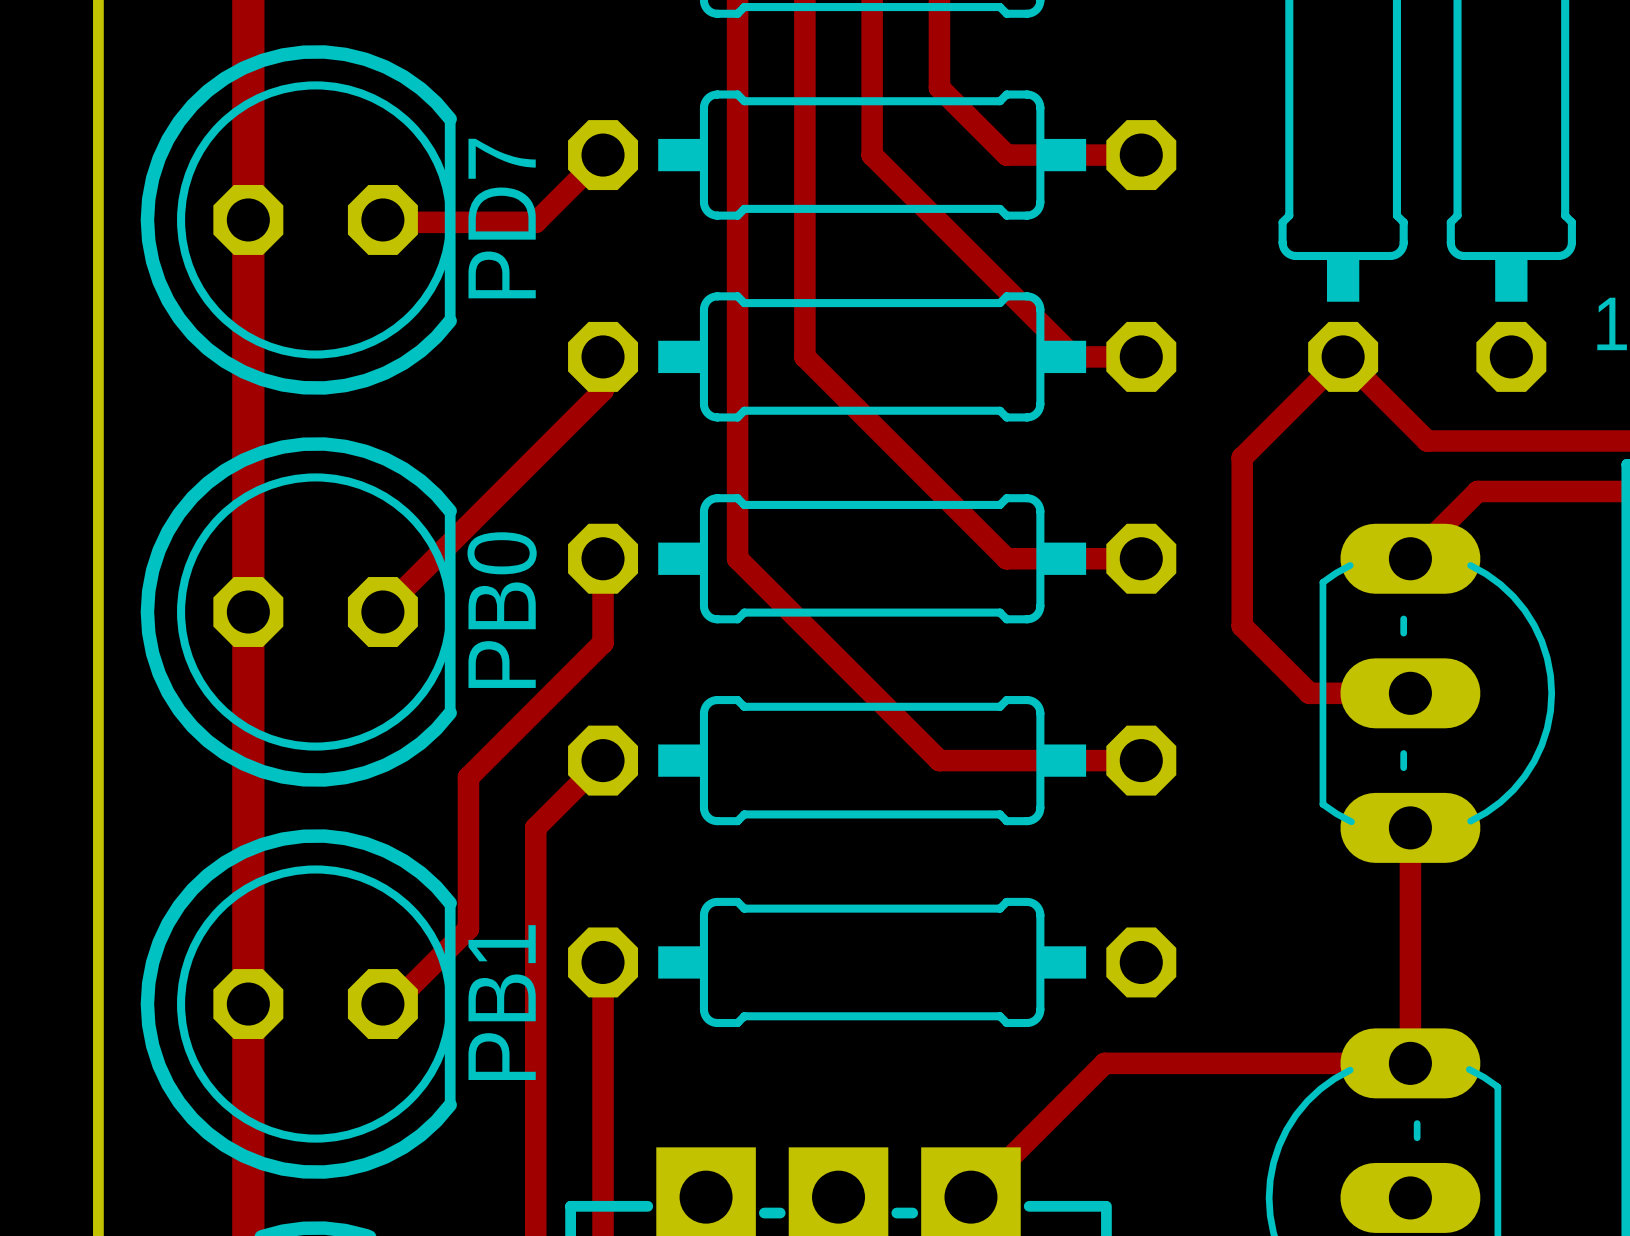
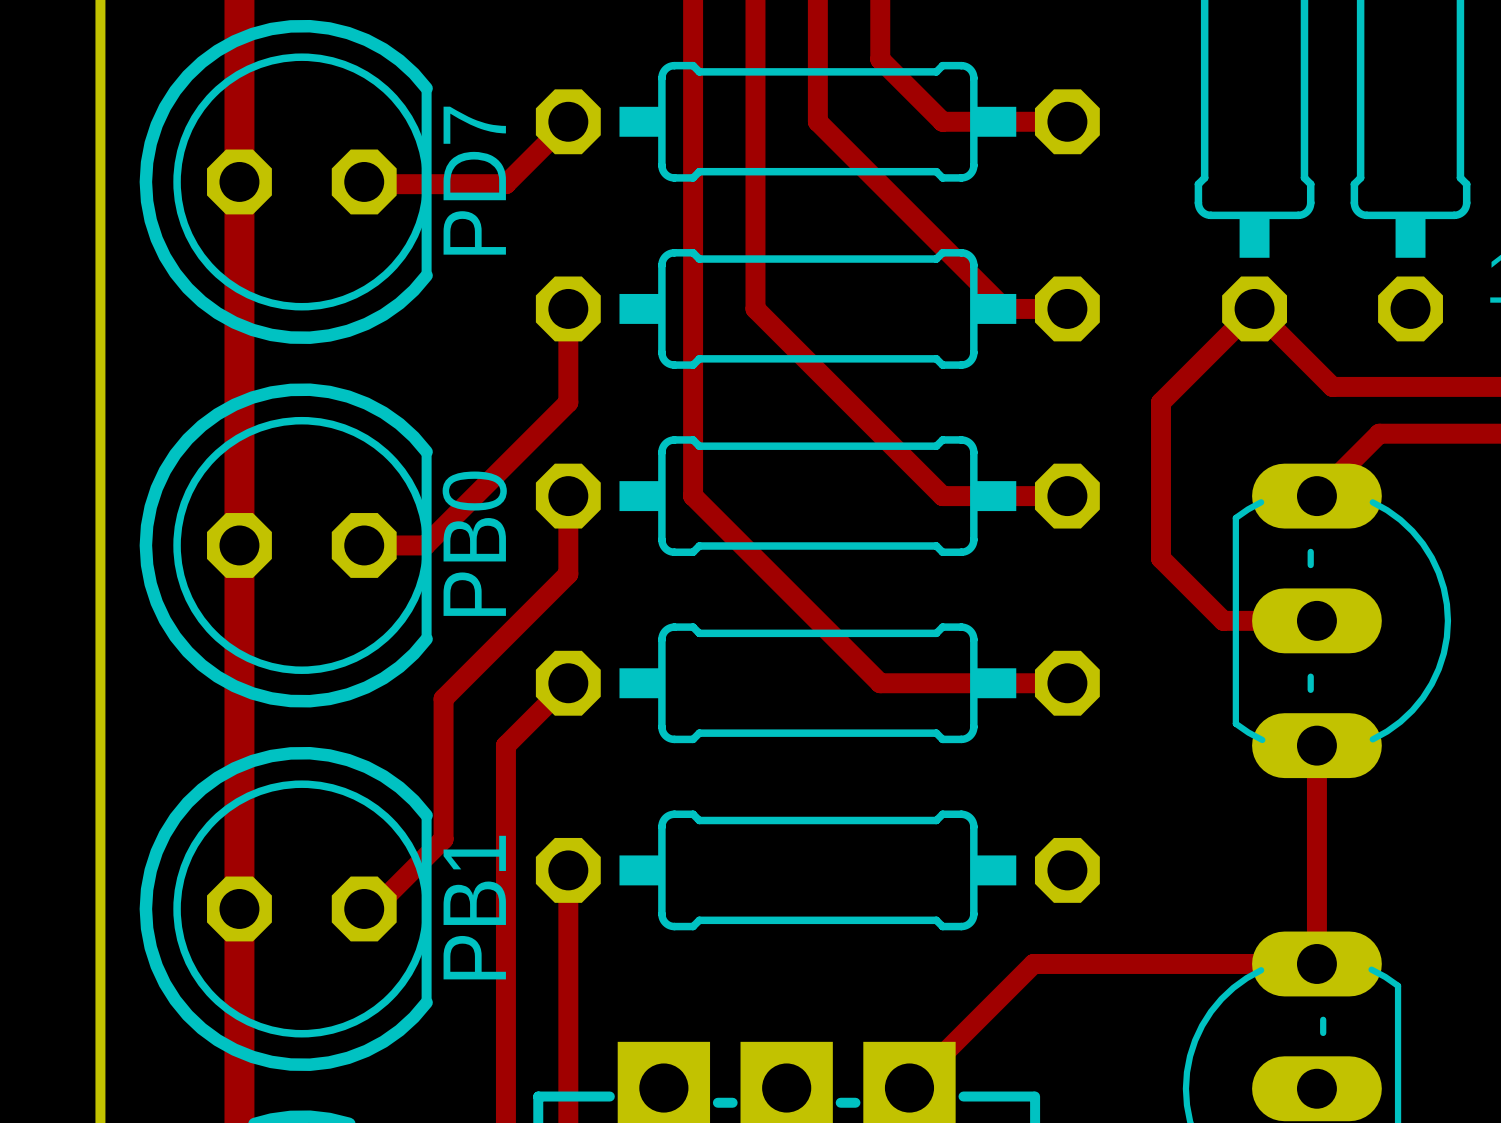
track: (603, 390) (382, 612) -> (568, 340) (568, 402) (425, 545) (364, 545)

